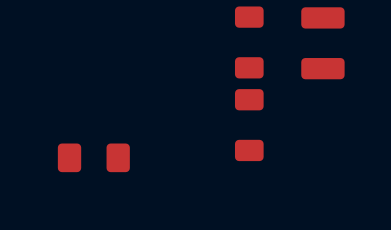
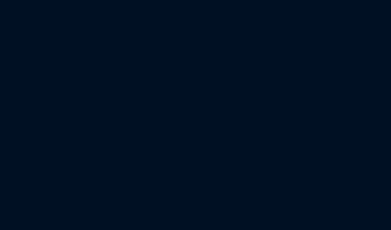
part: (249, 42) -> none
part: (322, 43) -> none
part: (249, 125) -> none
part: (93, 157) -> none

